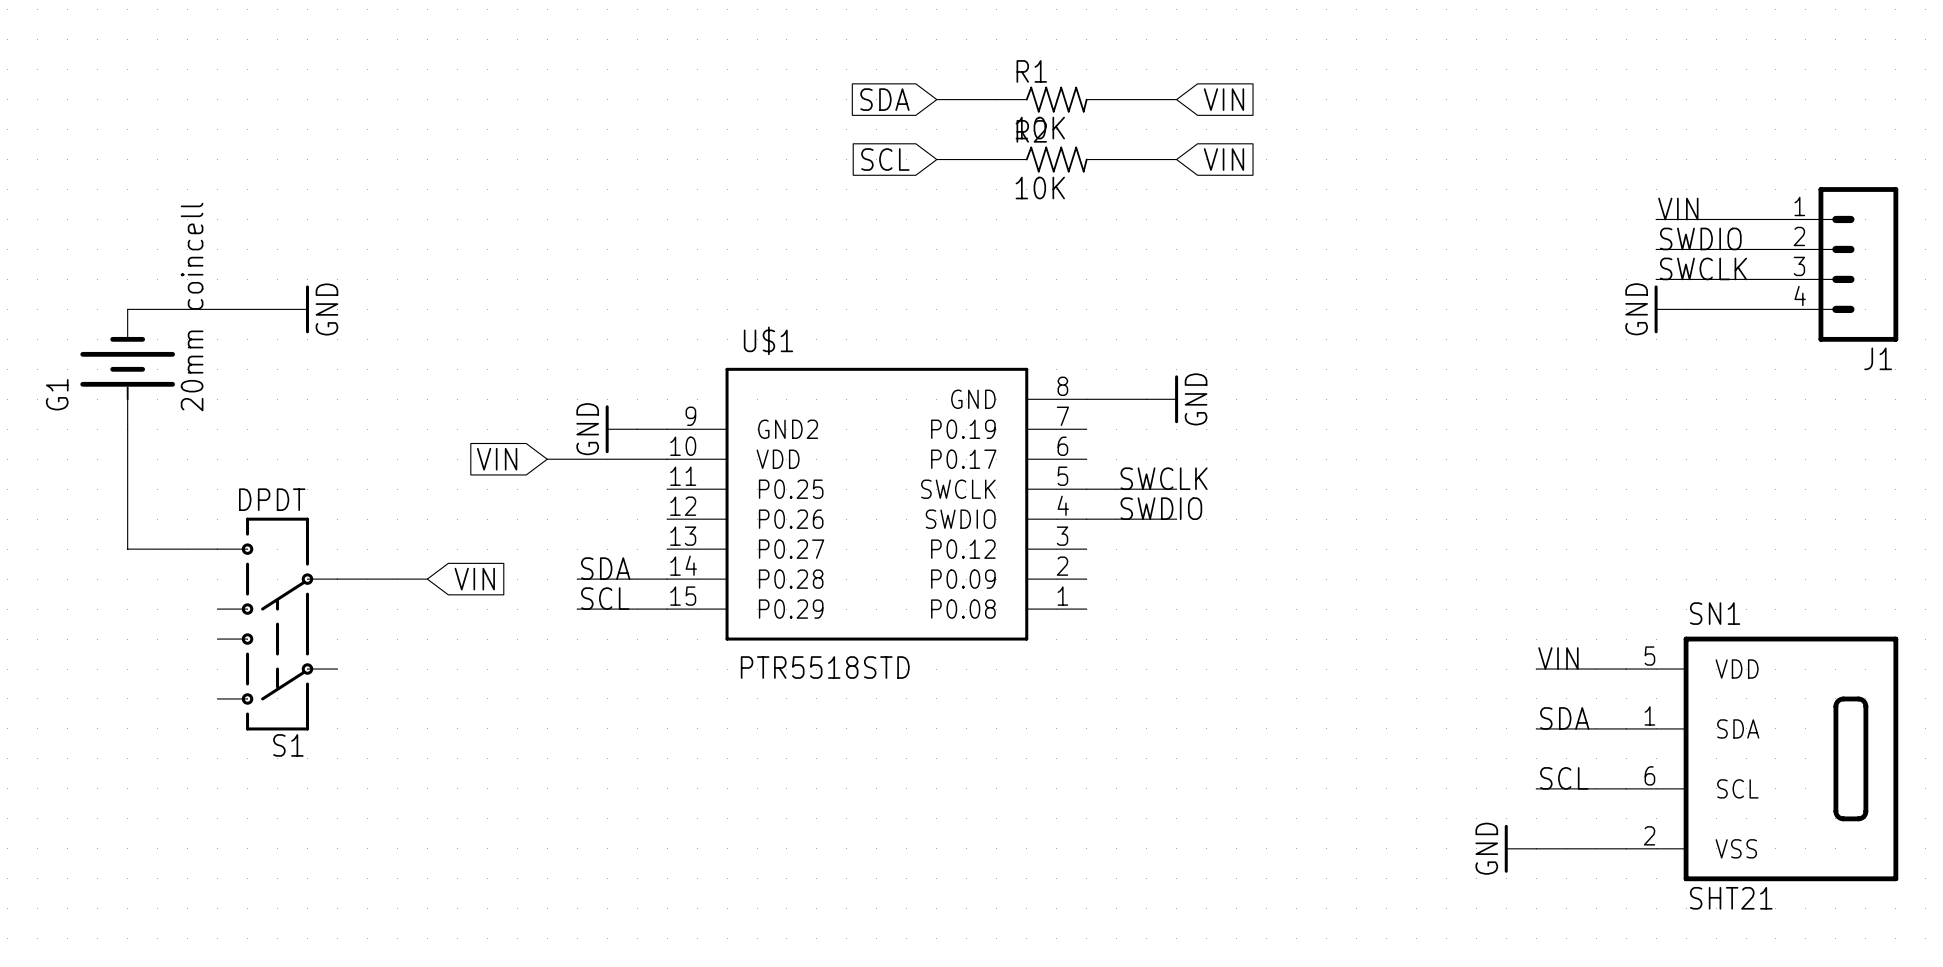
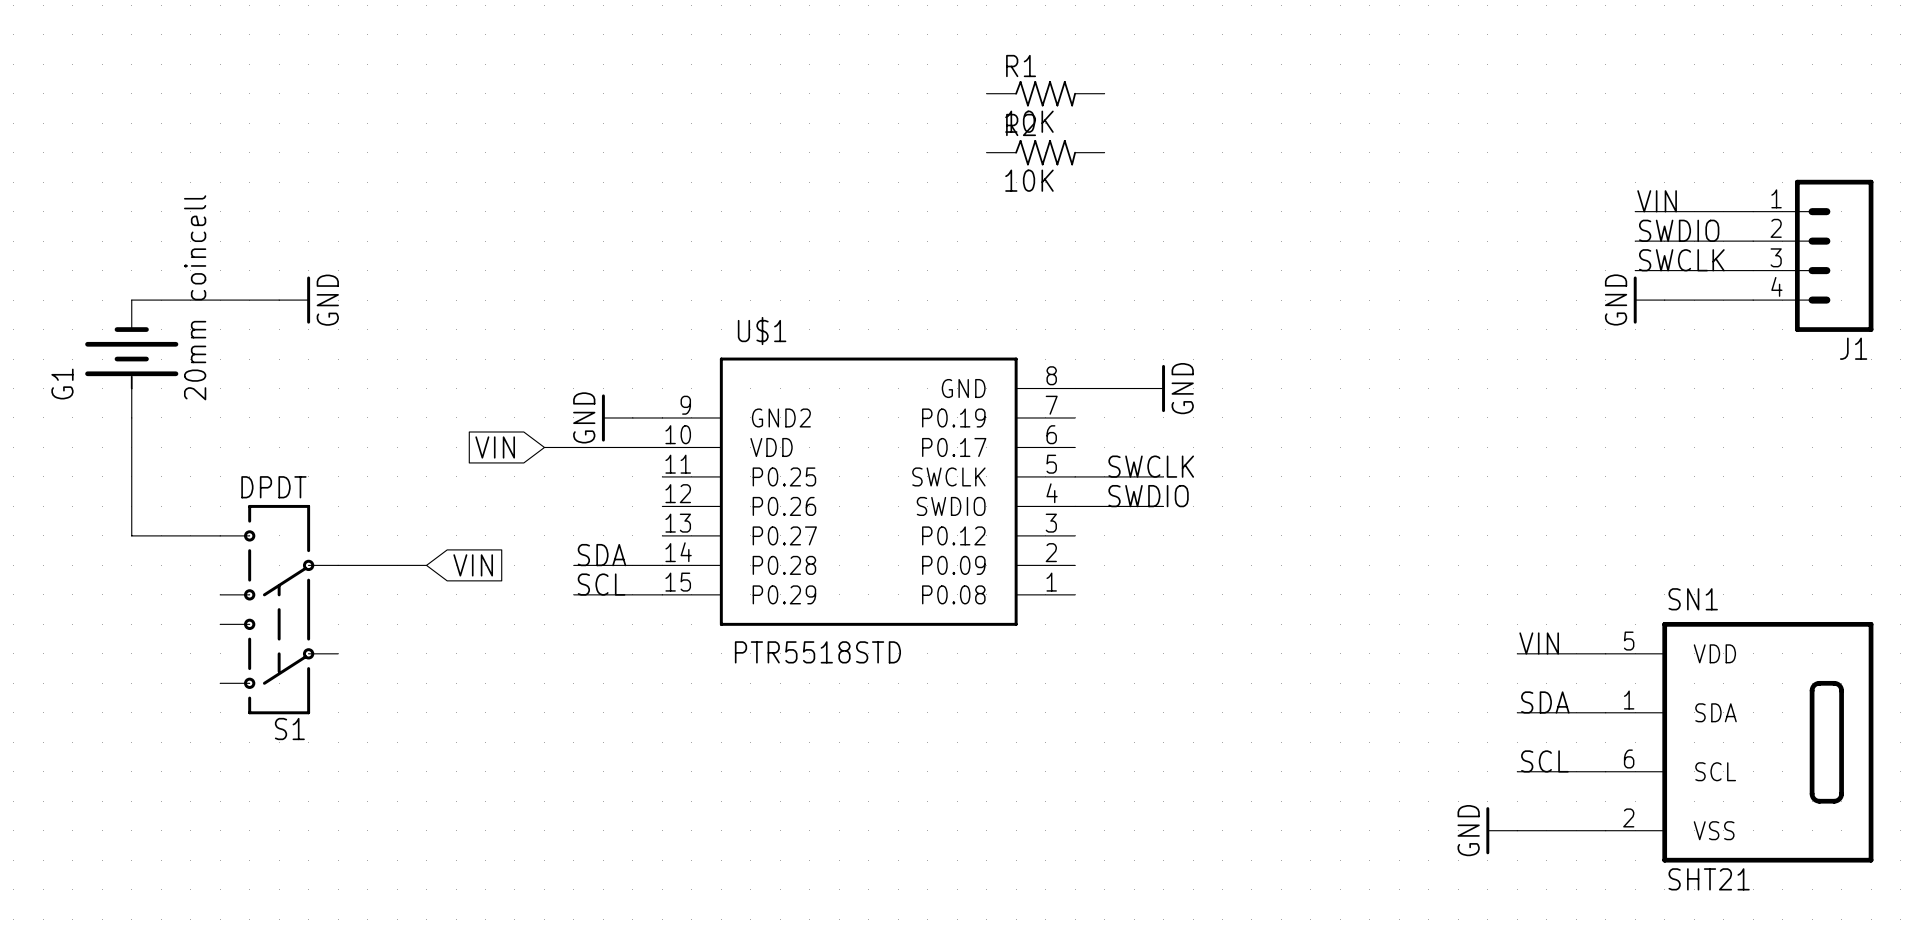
global label: SDA (884, 99) -> none
wire: (936, 99) (996, 99) -> none
wire: (1116, 99) (1176, 99) -> none
global label: VIN (1224, 99) -> none
global label: SCL (885, 159) -> none
wire: (936, 159) (996, 159) -> none
wire: (1116, 159) (1176, 159) -> none
global label: VIN (1224, 159) -> none

